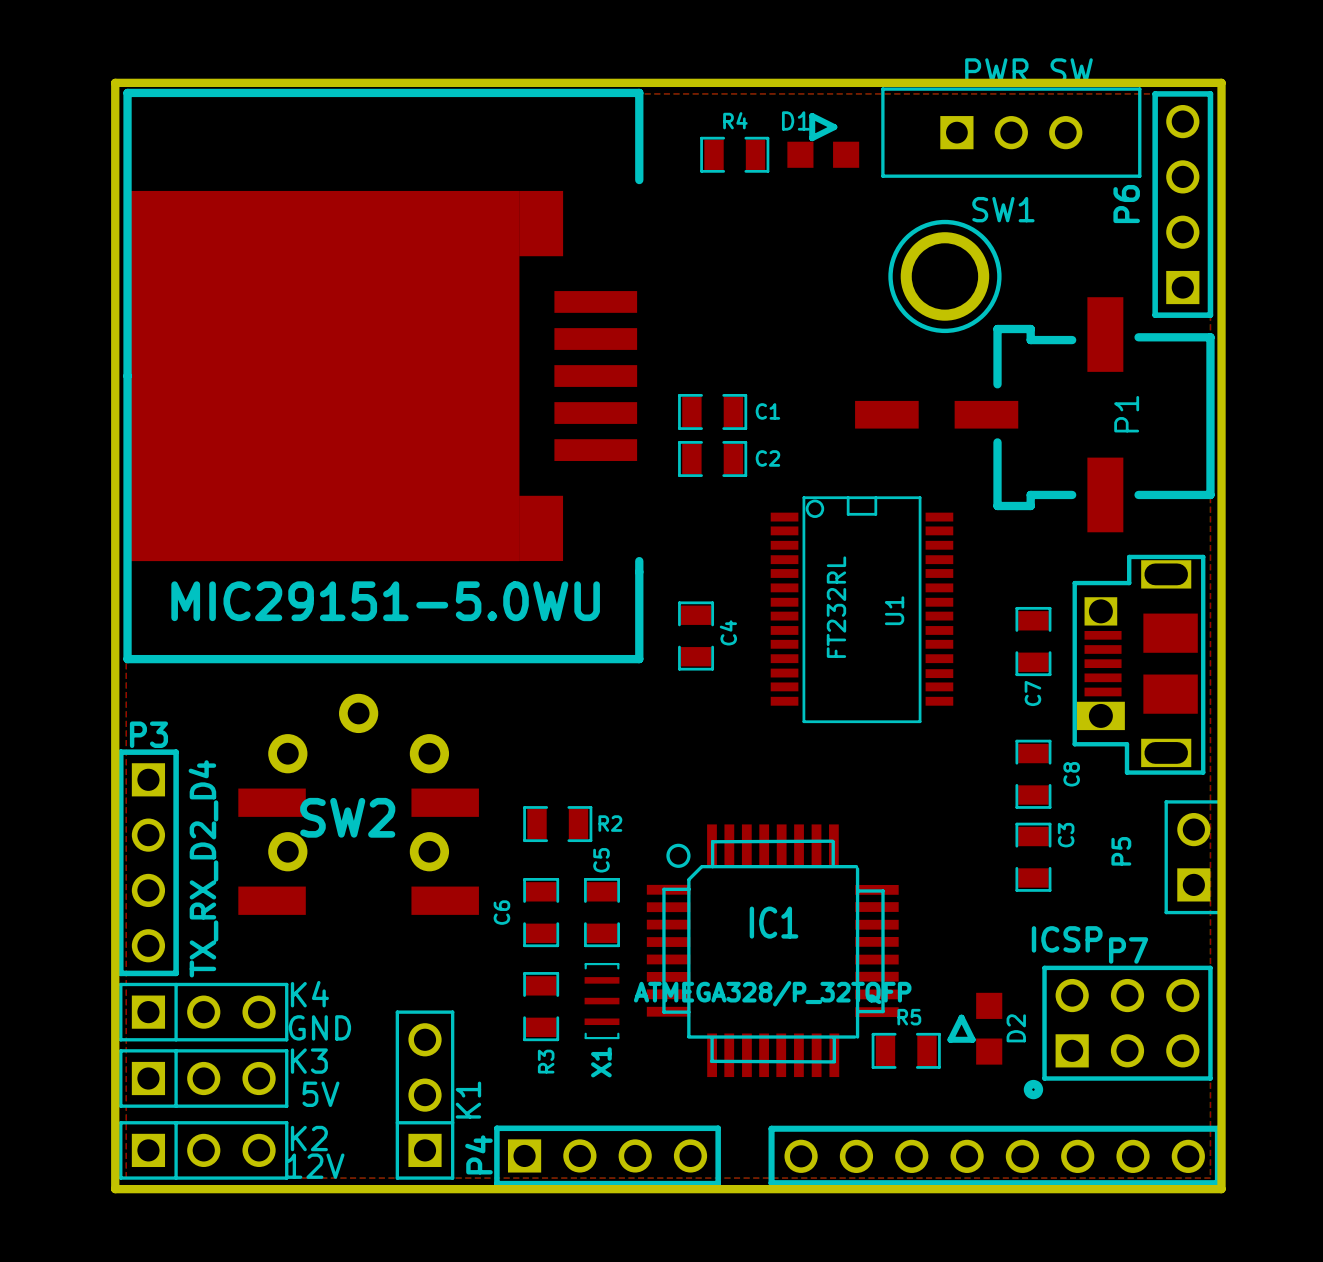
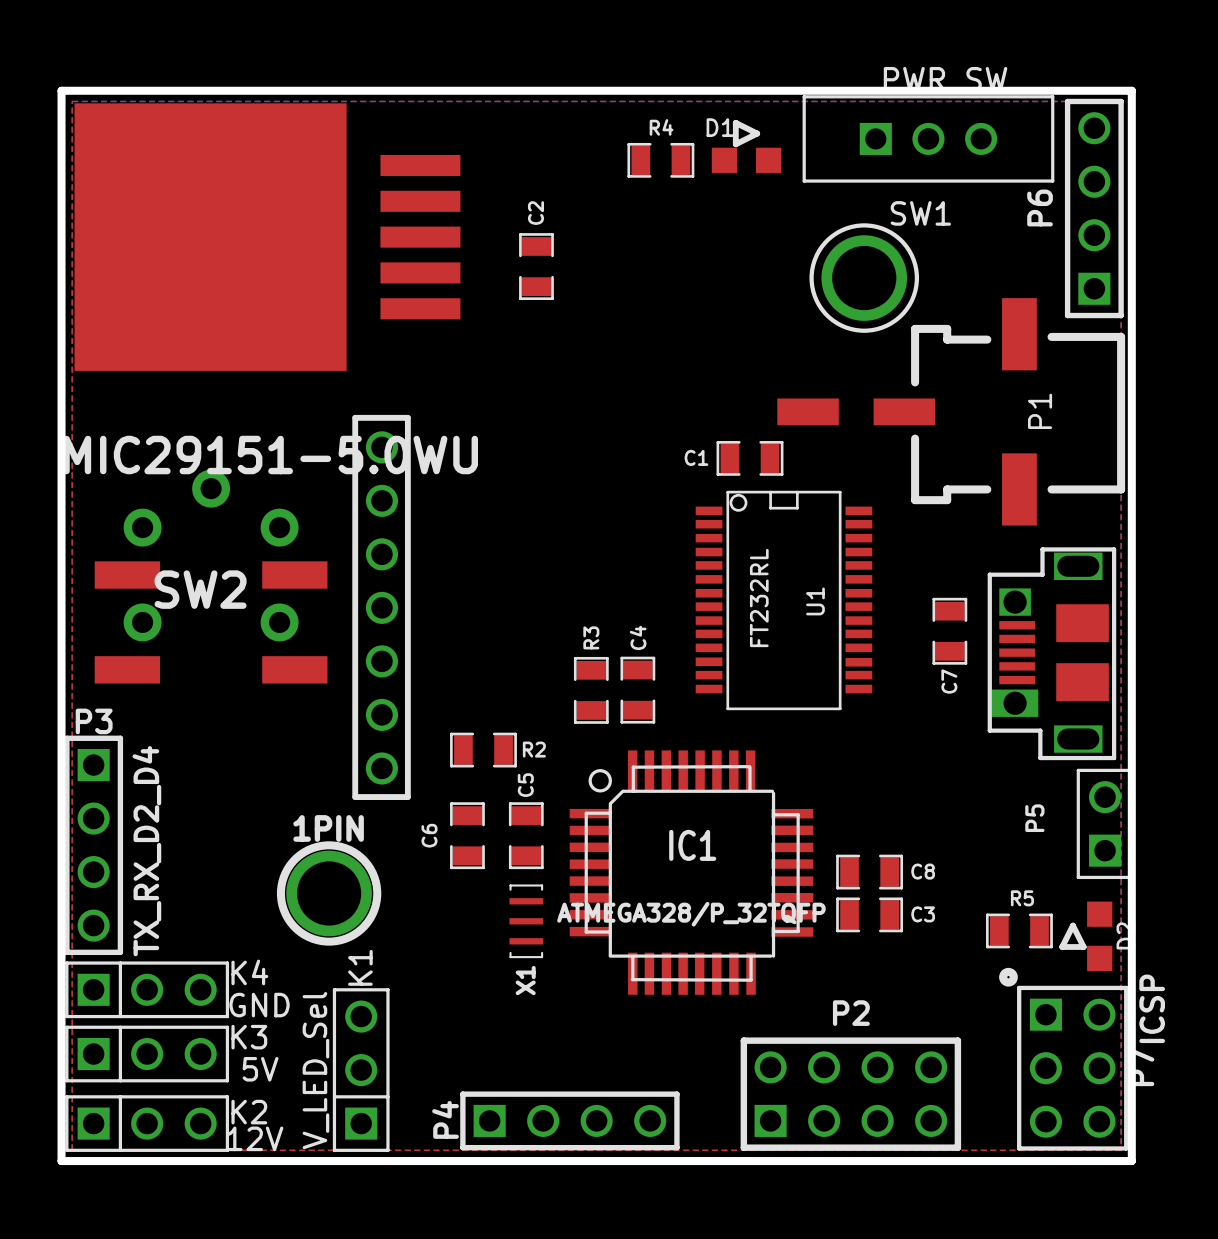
part: none -> MIC29151-5.0WU (267, 237)
part: MIC29151-5.0WU (383, 376) -> none
C1 position: (712, 411) -> (749, 458)
C1 name position: C1 (767, 411) -> C1 (696, 457)
C2 rotation: 0° (712, 458) -> 90° clockwise (536, 266)
C2 position: (712, 458) -> (536, 266)
C2 name position: C2 (767, 458) -> C2 (535, 213)
part: none -> (381, 607)
C4 name position: C4 (728, 632) -> C4 (638, 637)
C4 position: (696, 635) -> (637, 690)
C8 rotation: 0° (1033, 774) -> 90° clockwise (869, 872)
C8 position: (1033, 774) -> (869, 872)
SW2 position: (358, 804) -> (211, 576)
R2 position: (557, 824) -> (483, 750)
C3 rotation: 0° (1033, 857) -> 90° clockwise (869, 914)
C3 position: (1033, 857) -> (869, 914)
P5 position: (1193, 857) -> (1105, 823)
1PIN: none -> (329, 893)
C6 position: (541, 912) -> (467, 835)
C5 position: (602, 912) -> (526, 835)
IC1 position: (772, 950) -> (691, 872)
X1 position: (602, 1001) -> (526, 921)
R3 position: (541, 1006) -> (591, 690)
D2 position: (974, 1028) -> (1085, 936)
P7 rotation: 0° (1118, 1032) -> 90° clockwise (1063, 1059)
R5 position: (906, 1050) -> (1019, 930)
R3 name position: R3 (546, 1061) -> R3 (591, 637)
K1 value: none -> V_LED_Sel (315, 1070)
K1 name position: K1 (468, 1100) -> K1 (360, 967)
P2: none -> (850, 1094)
P4 position: (607, 1155) -> (569, 1120)
part: (994, 1155) -> none

